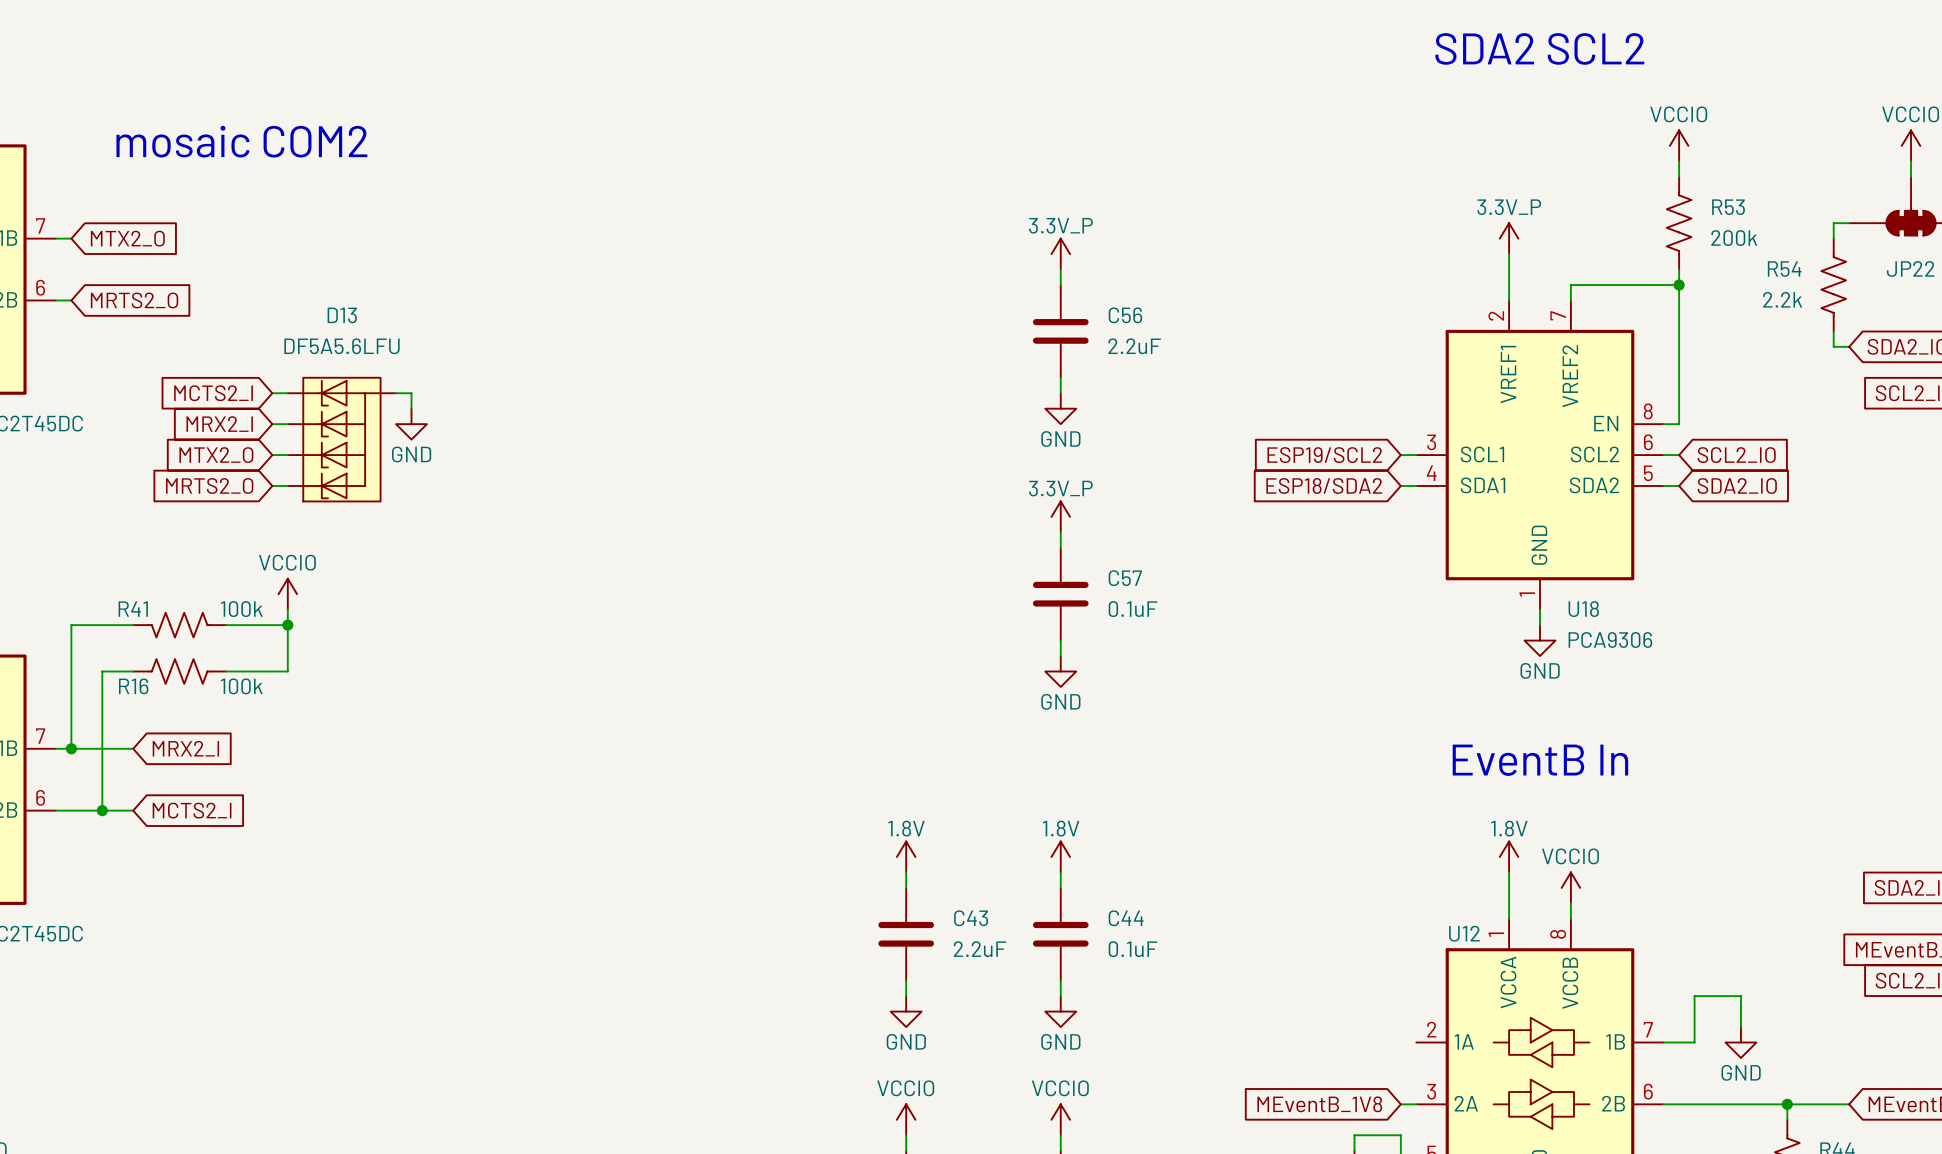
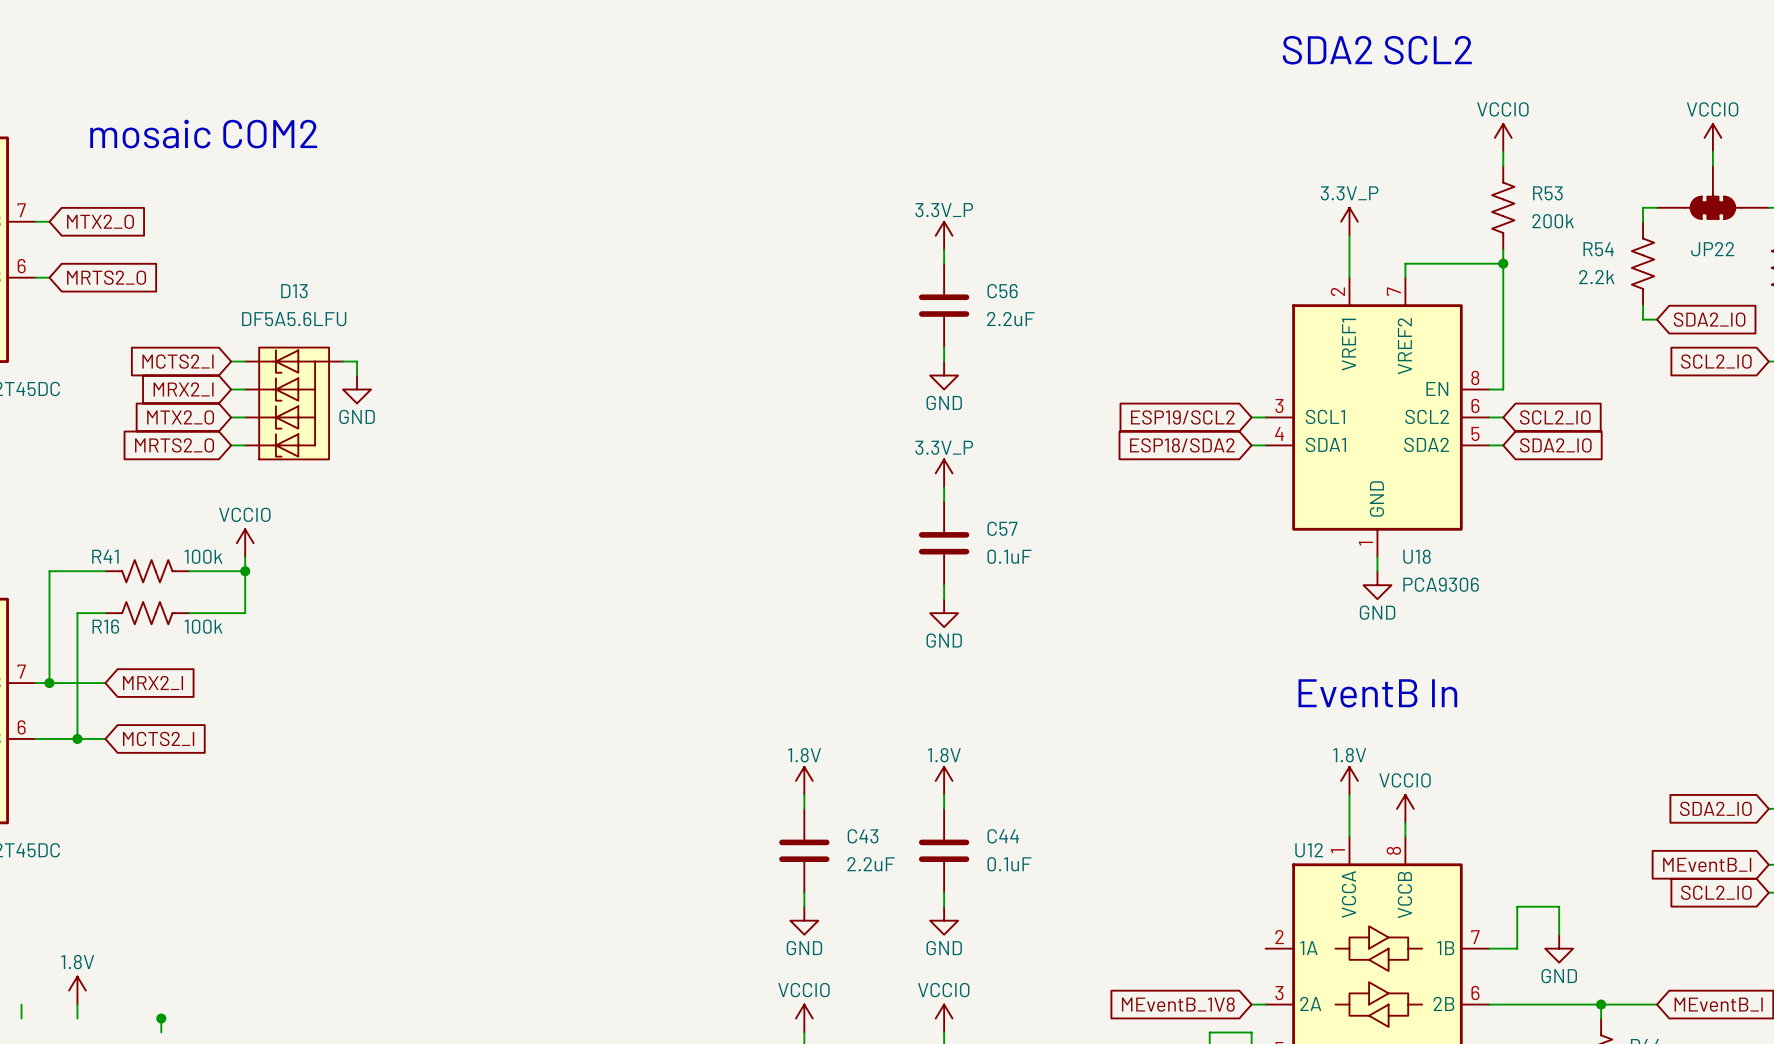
power symbol: none -> 1.8V (77, 990)
wire: none -> (21, 1004) (21, 1018)
wire: none -> (77, 1004) (77, 1018)
wire: none -> (161, 1018) (161, 1032)
junction: none -> (161, 1018)

